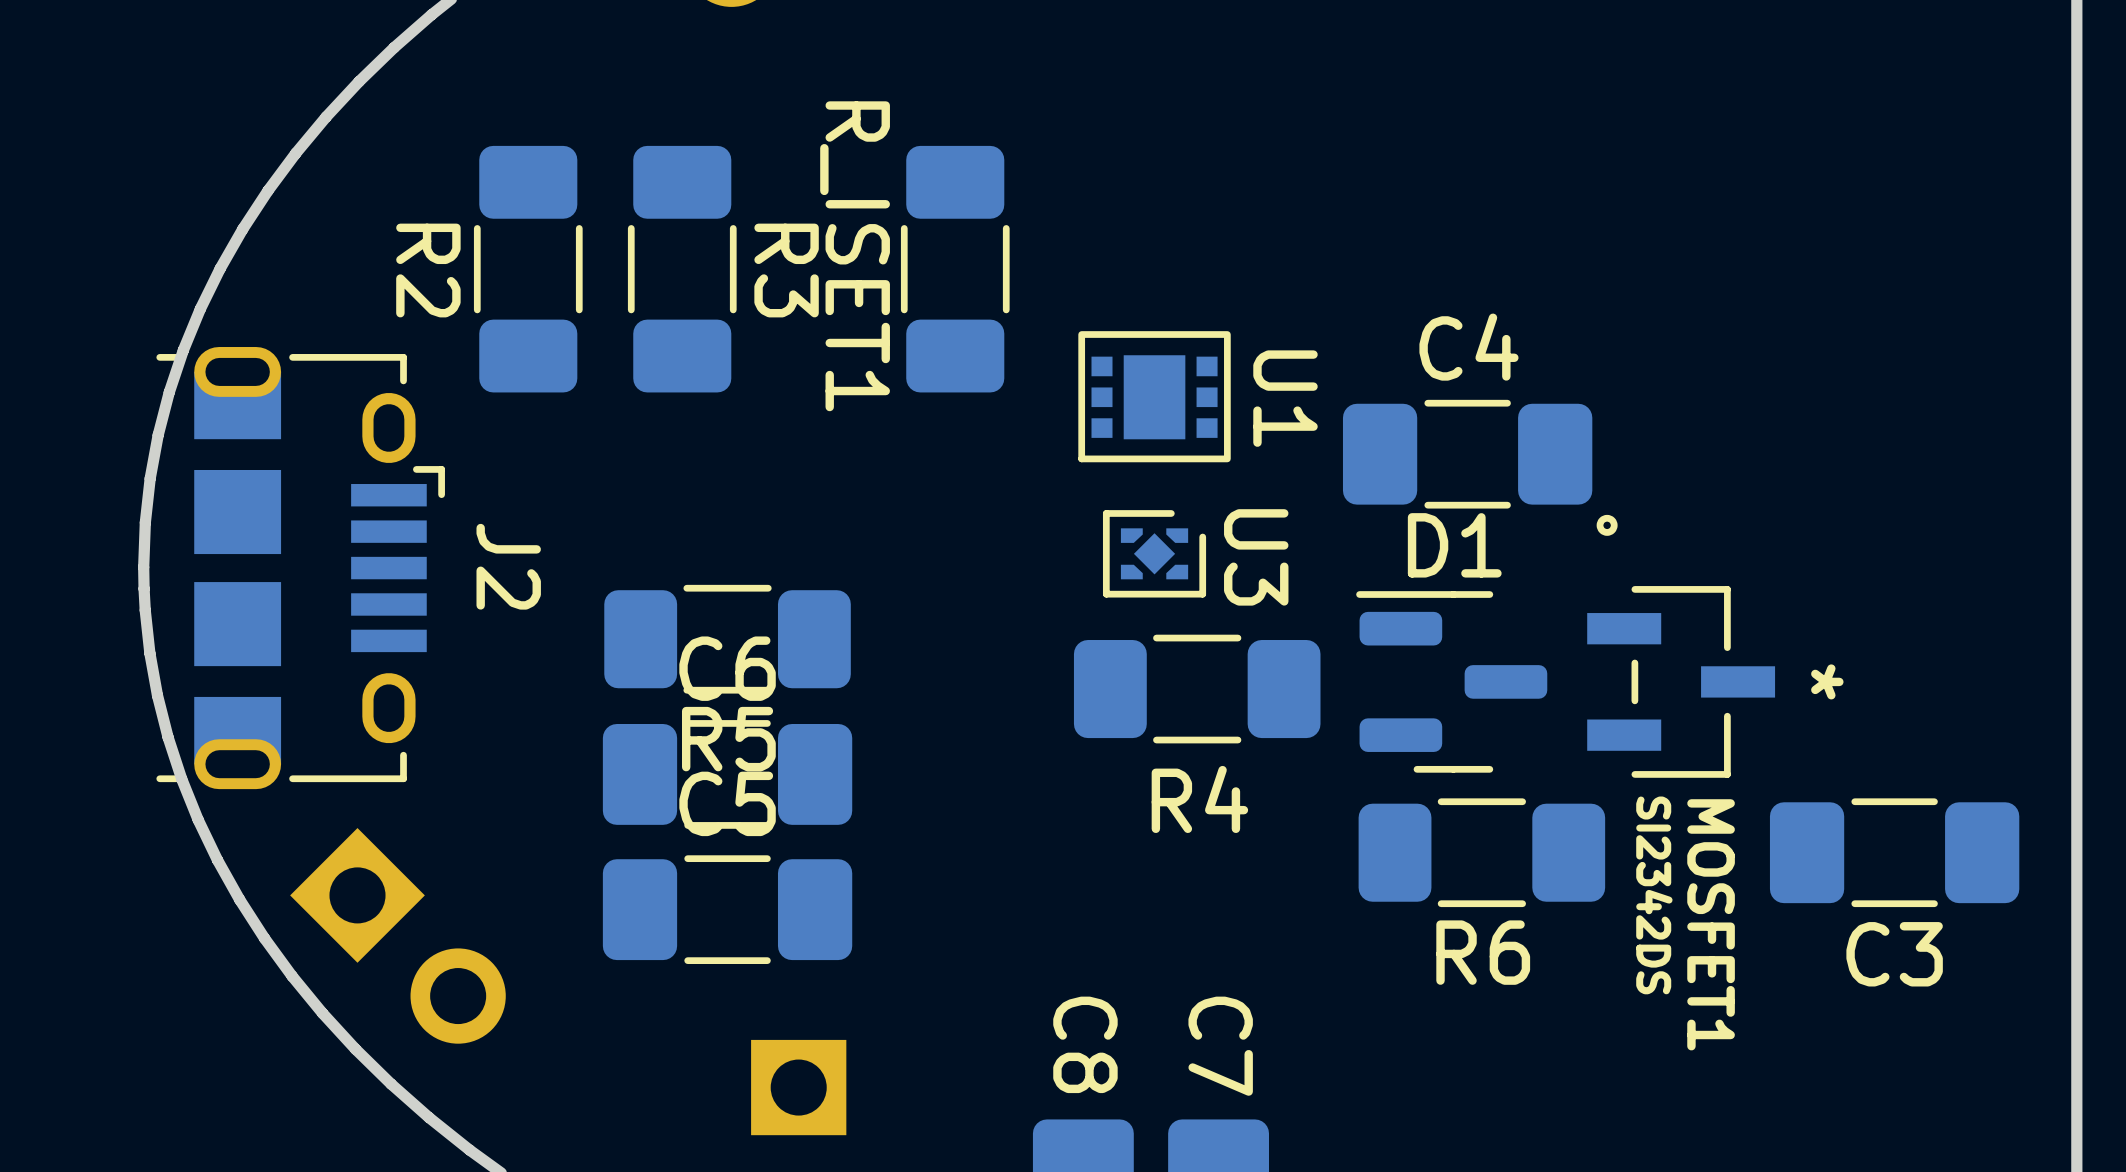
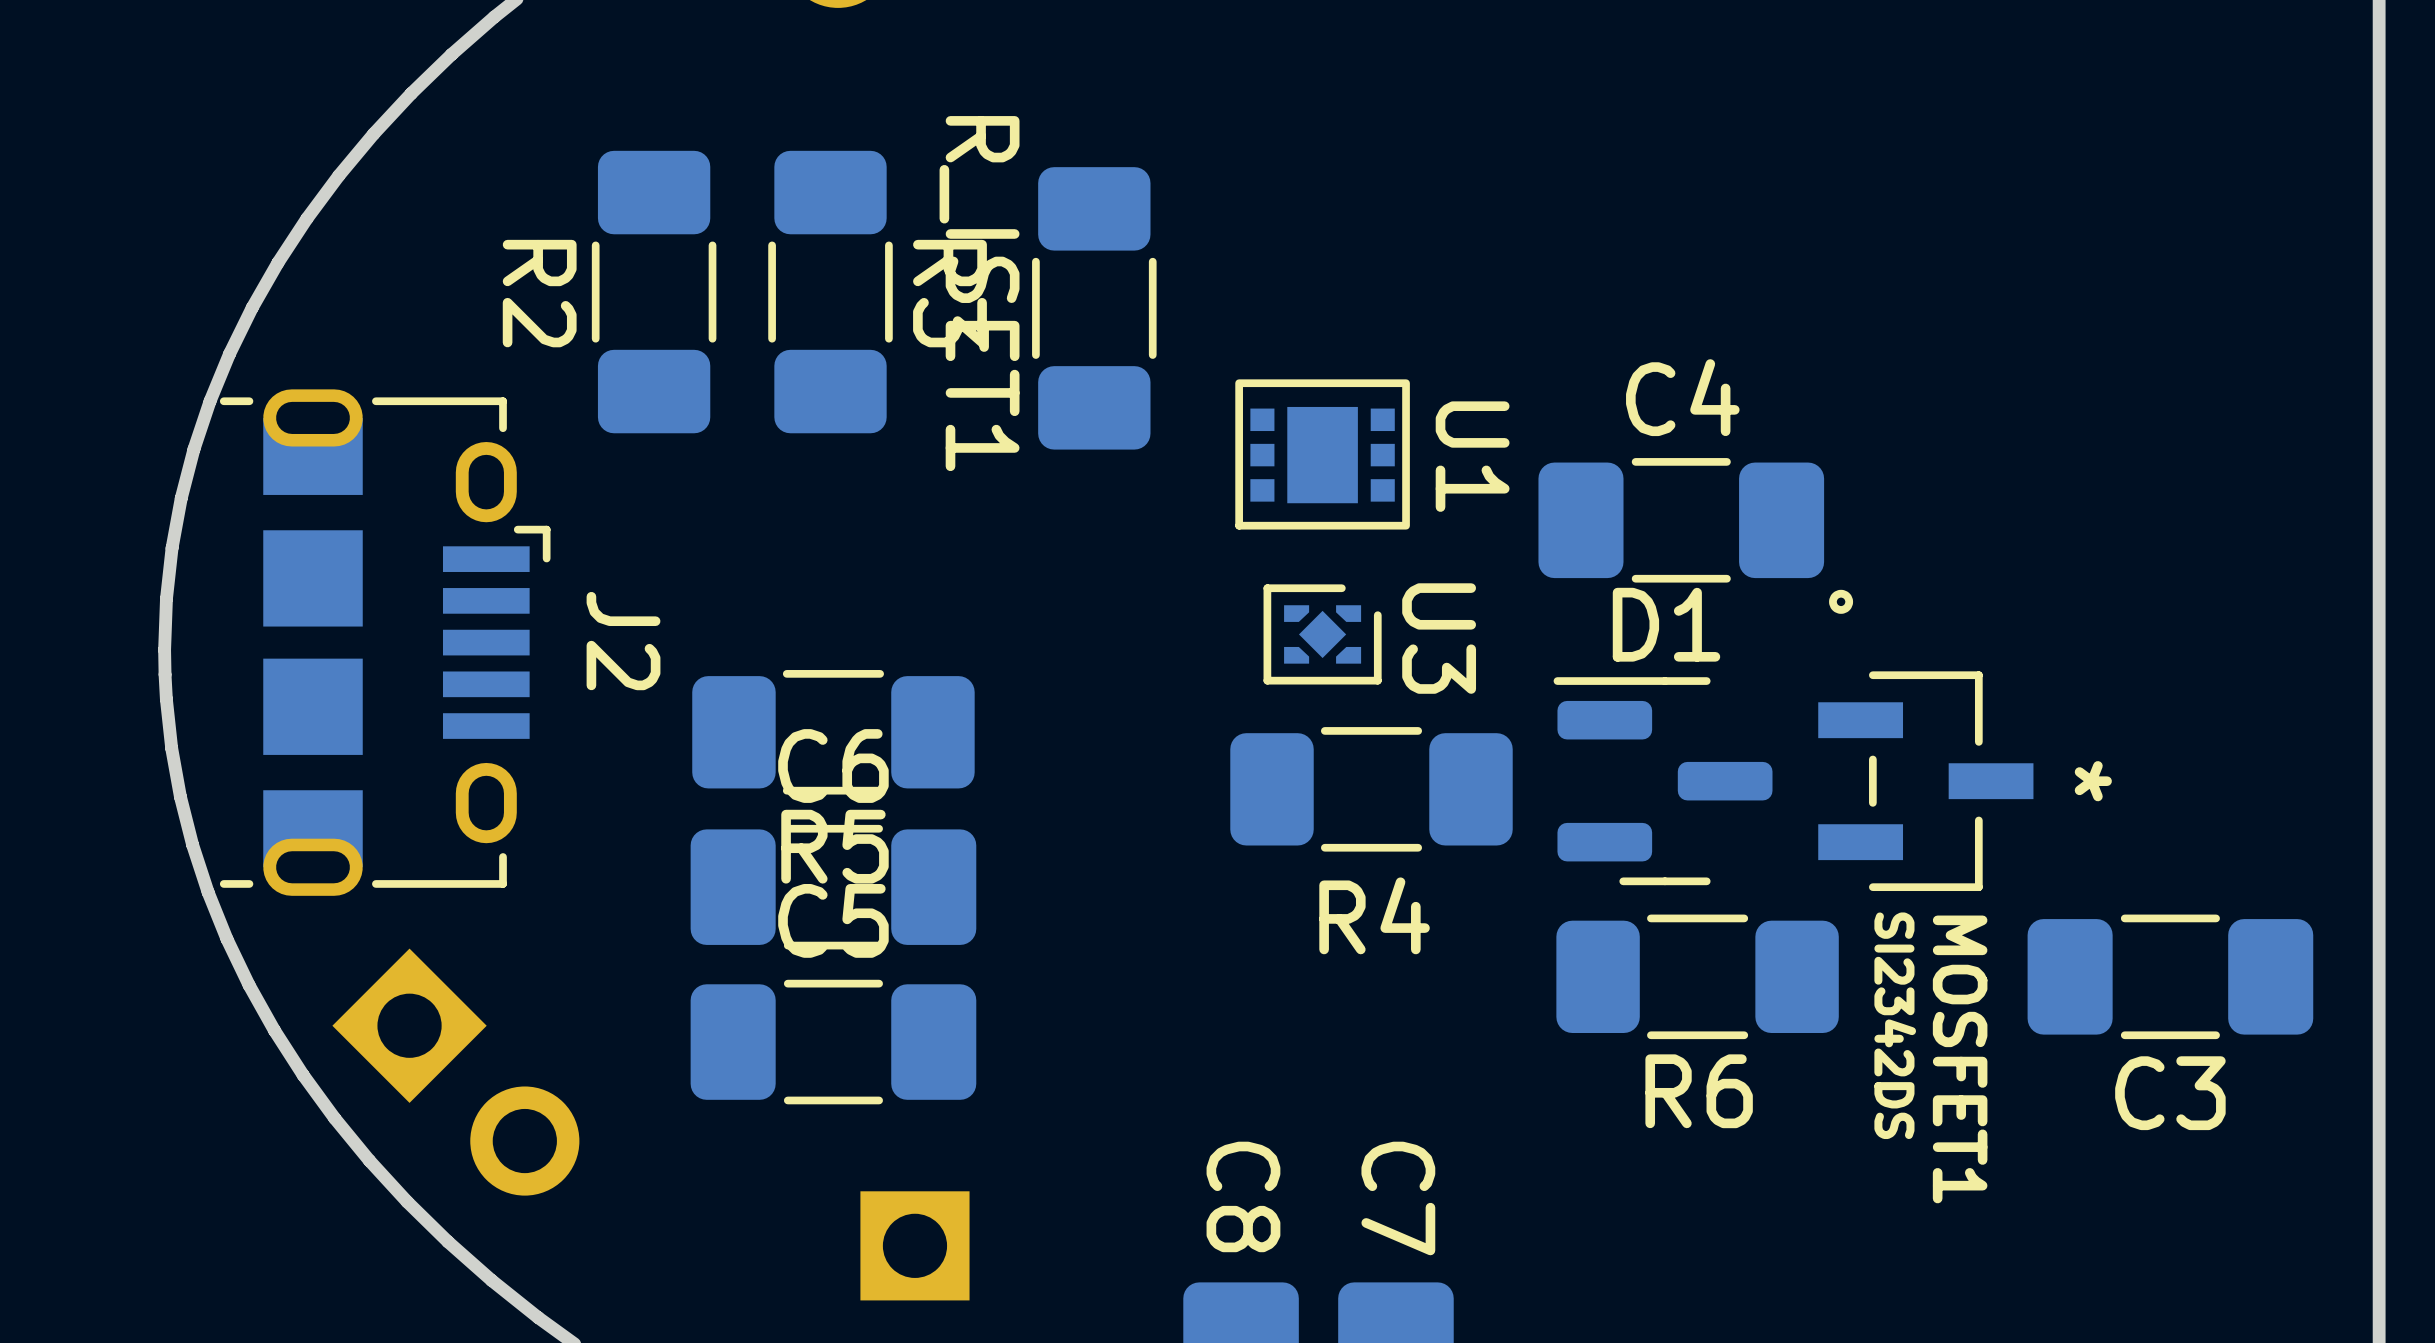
R2 position: (528, 269) -> (654, 292)
R3 position: (682, 269) -> (830, 292)
J2 position: (300, 568) -> (385, 642)

